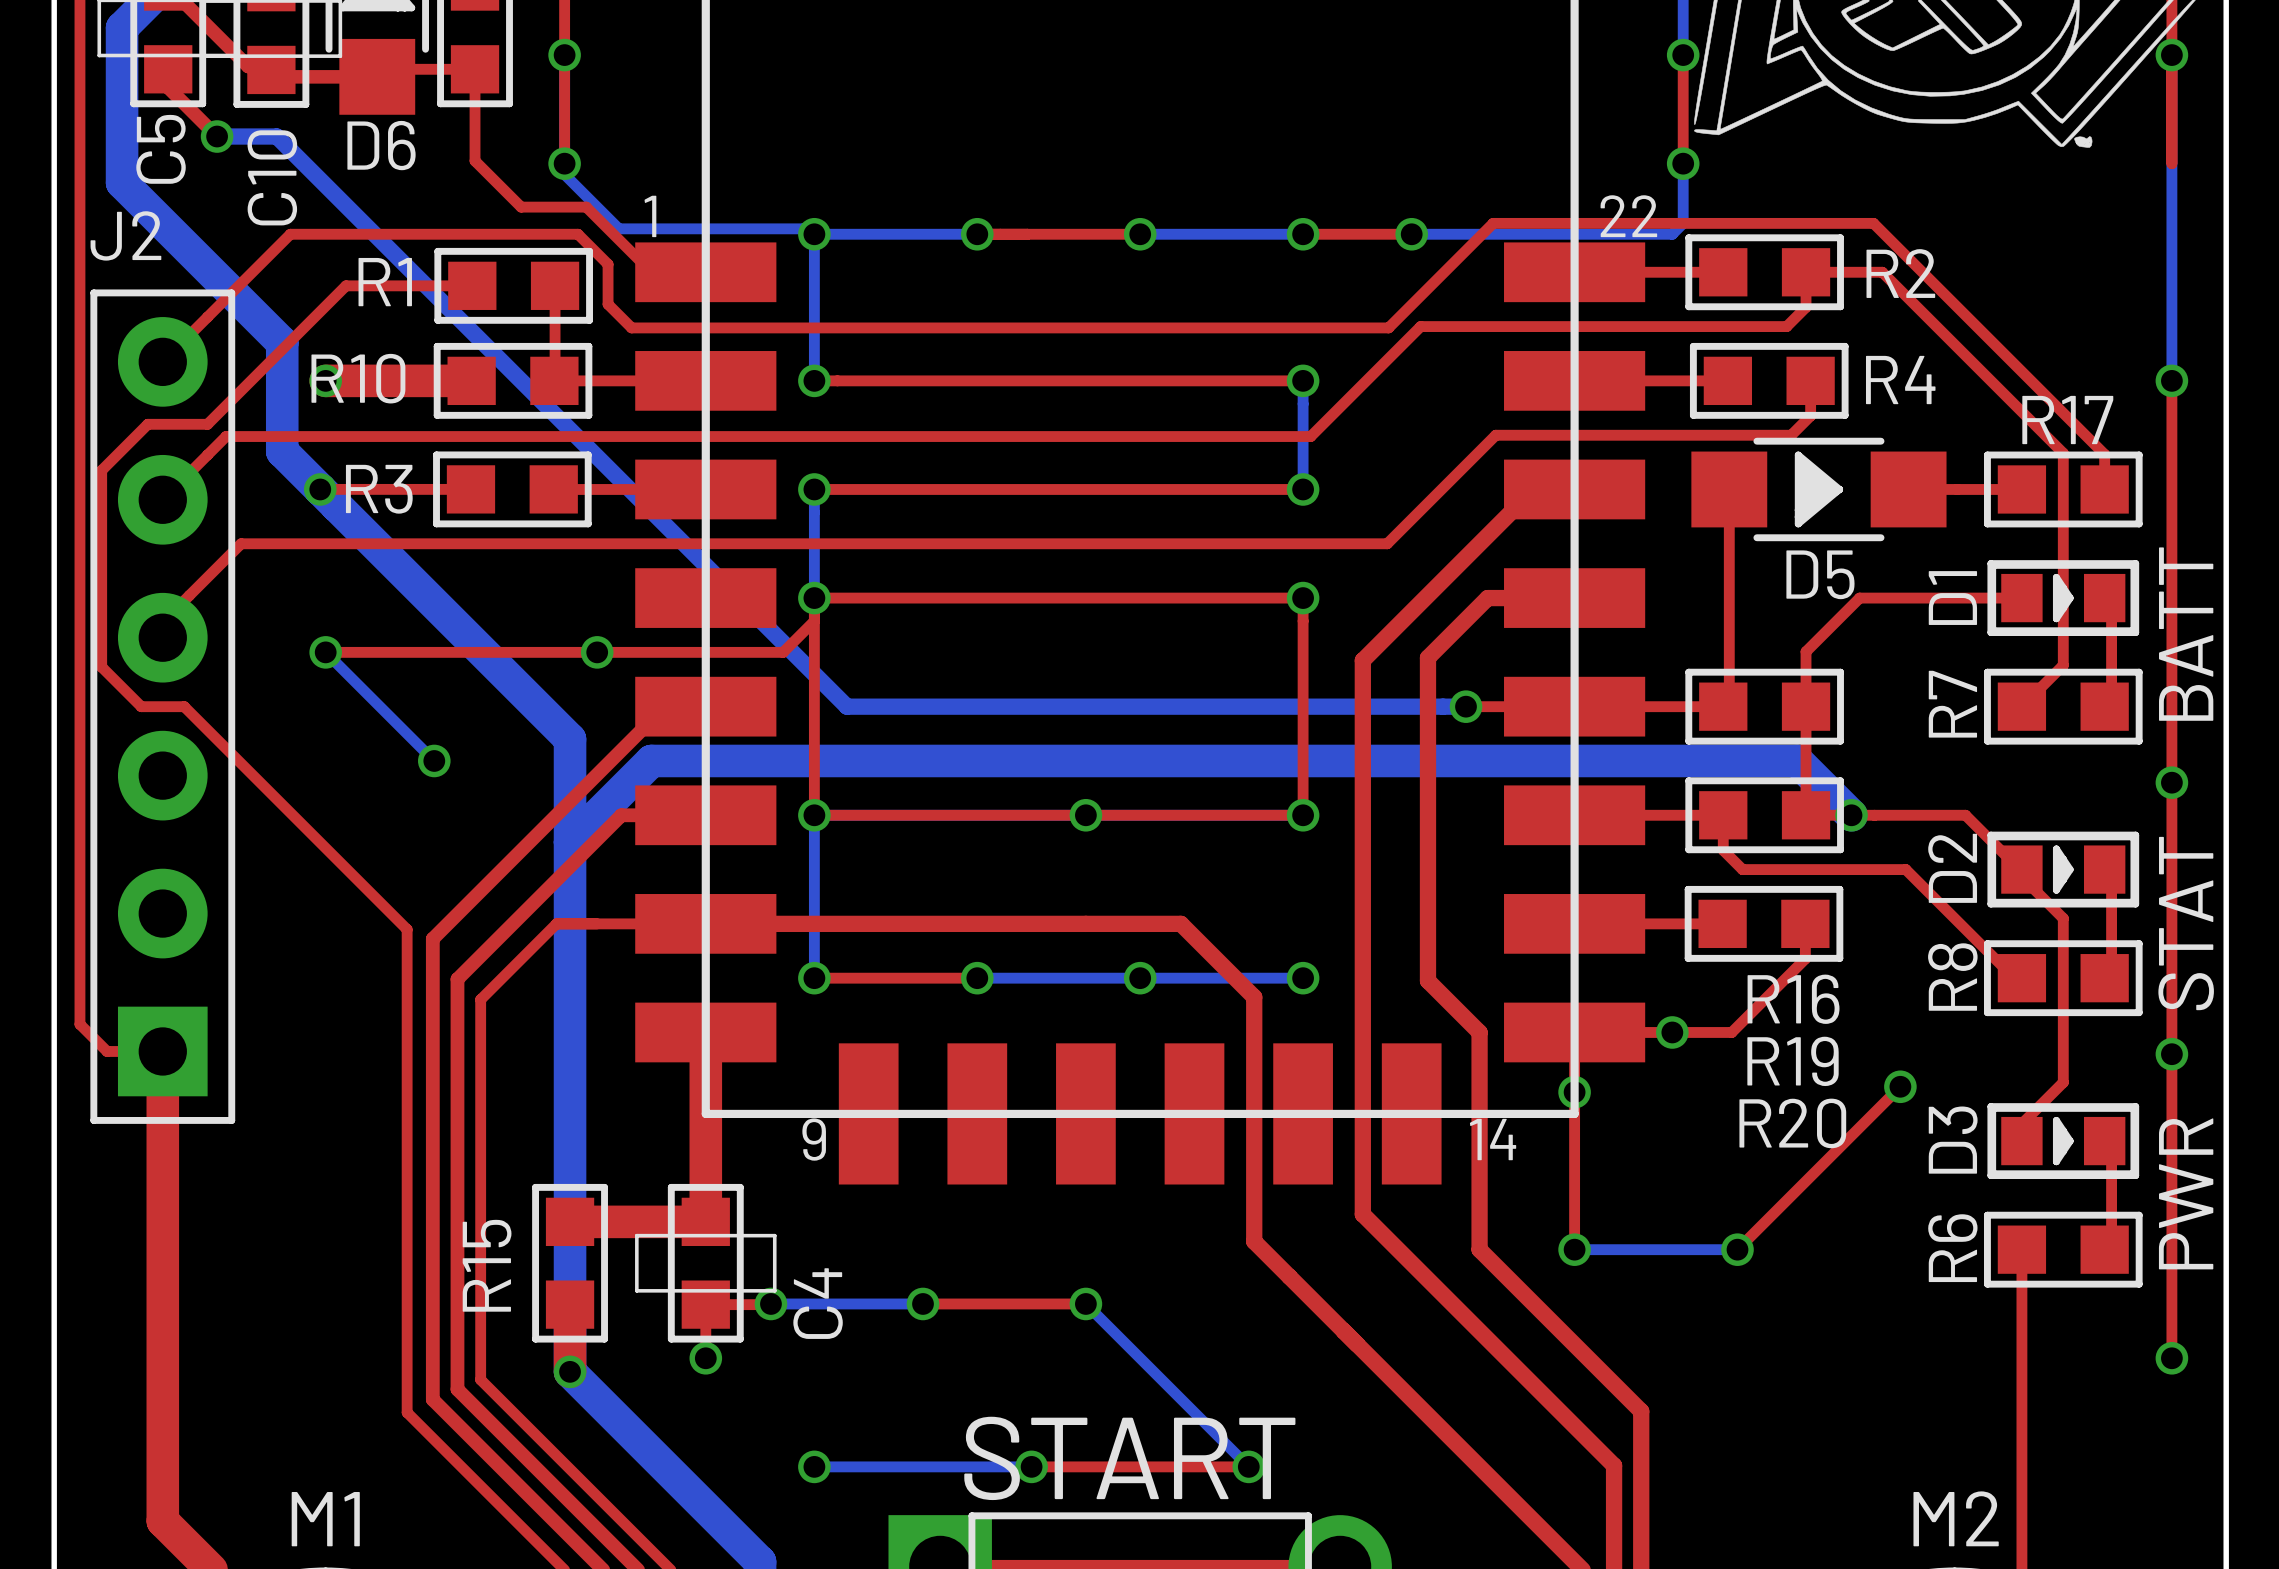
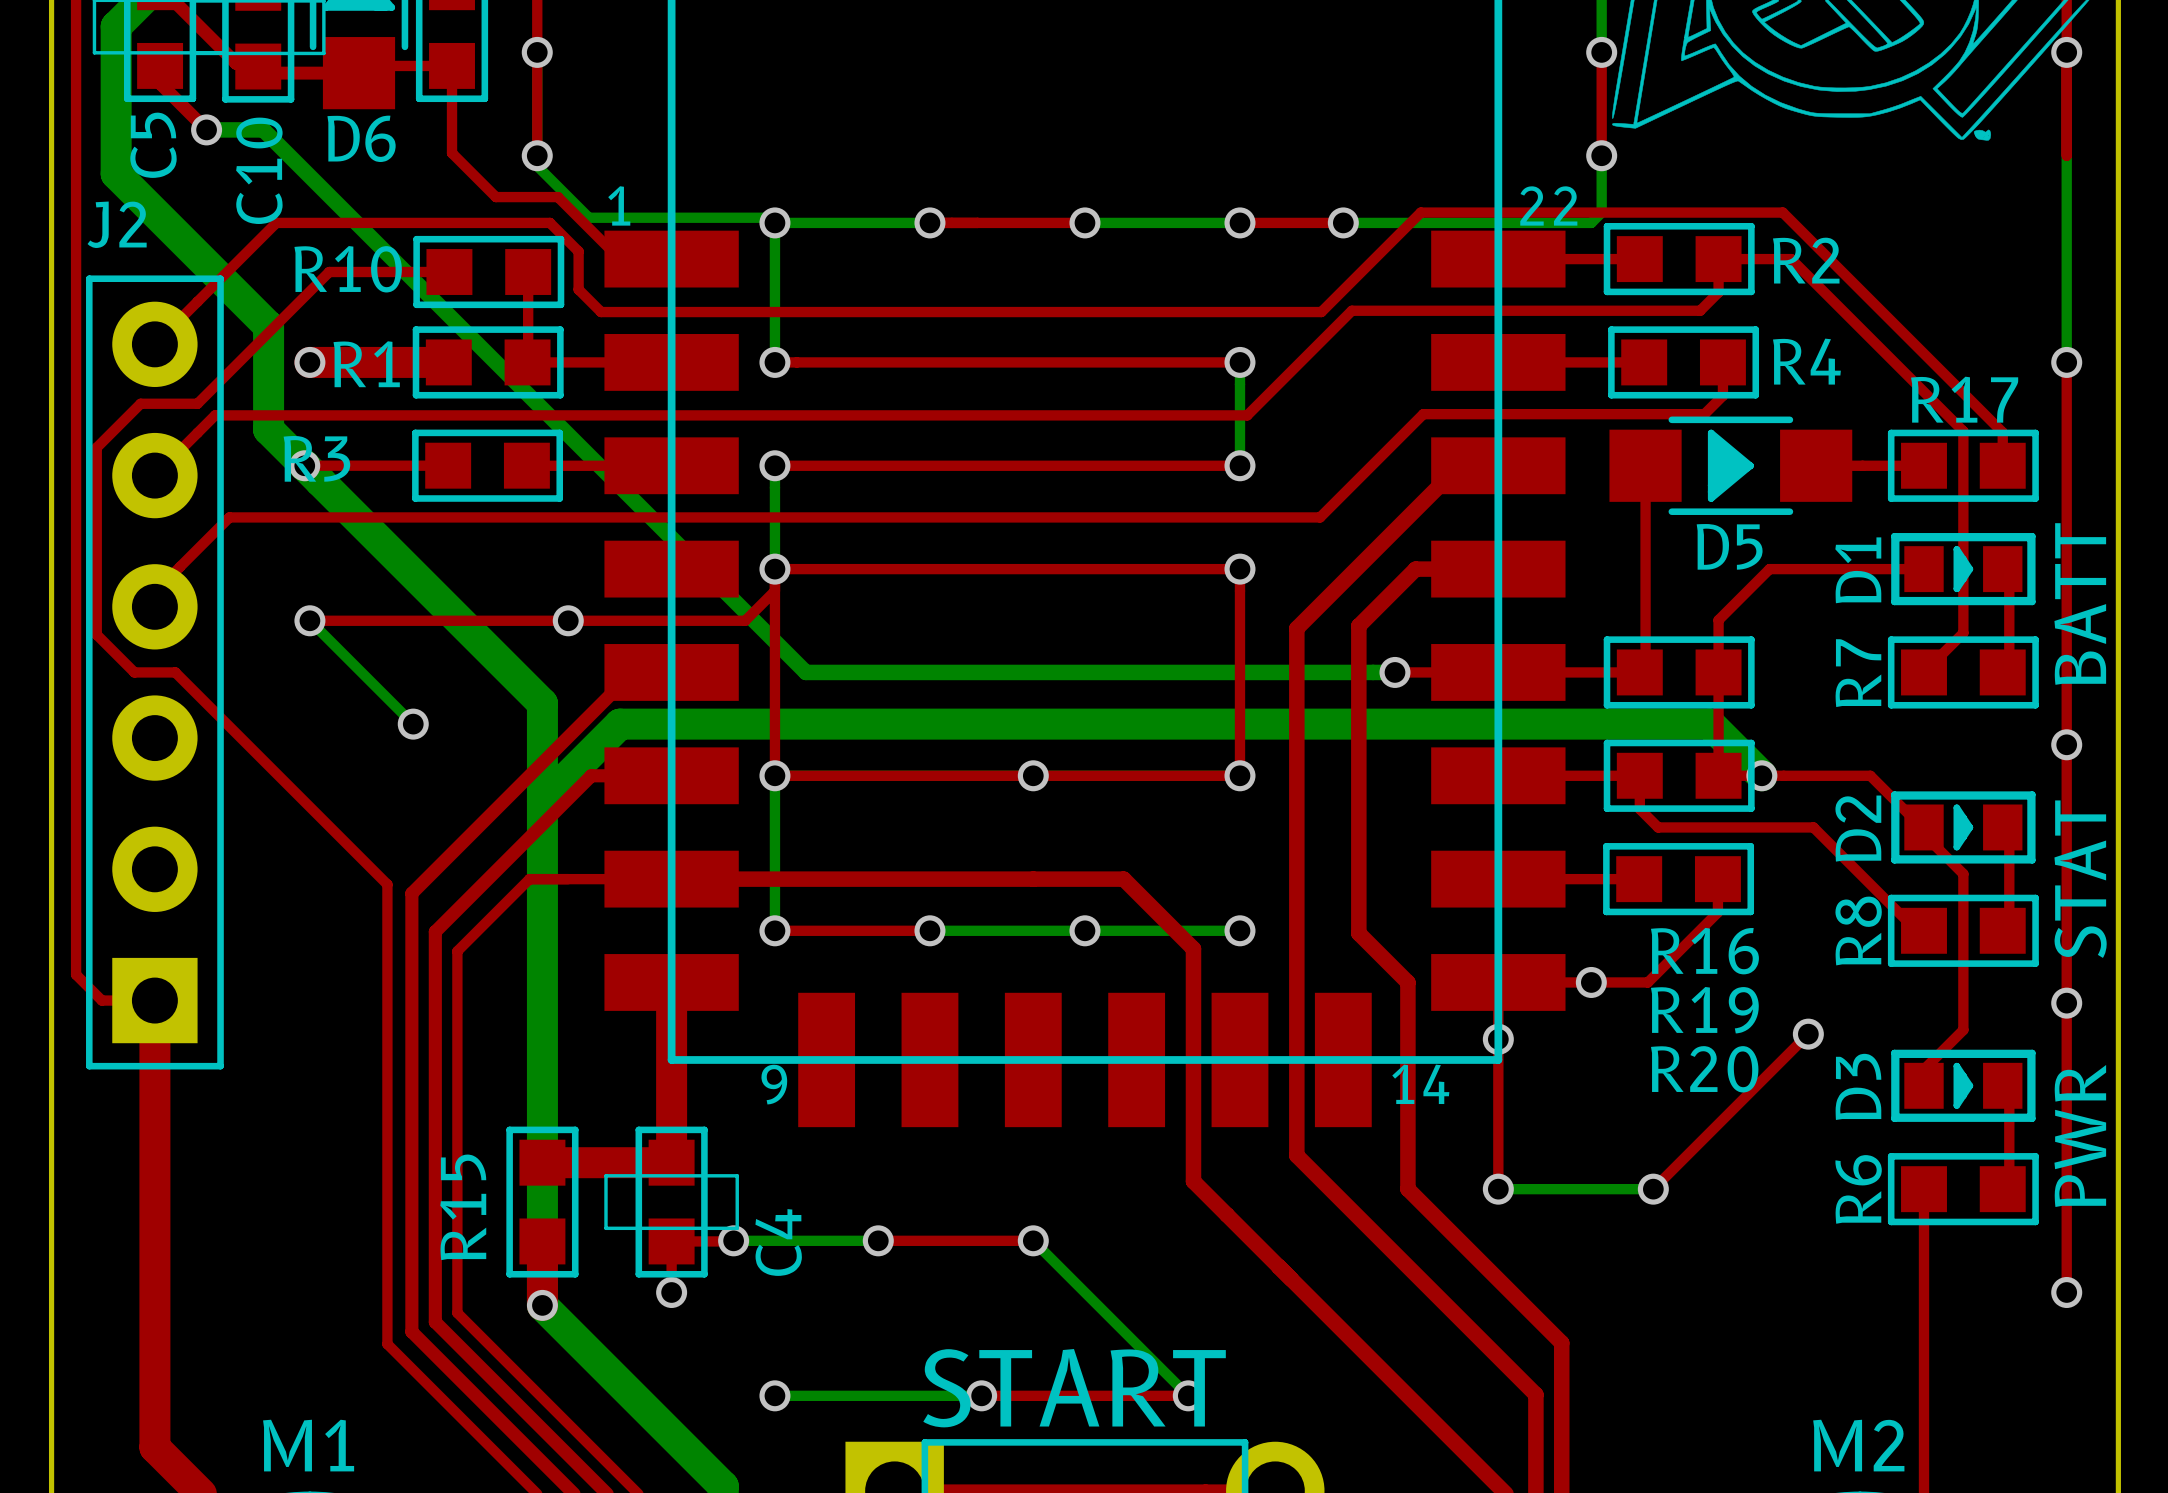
R1 name position: R1 (385, 282) -> R1 (366, 364)
R10 name position: R10 (358, 378) -> R10 (348, 269)
R3 name position: R3 (379, 489) -> R3 (316, 458)

